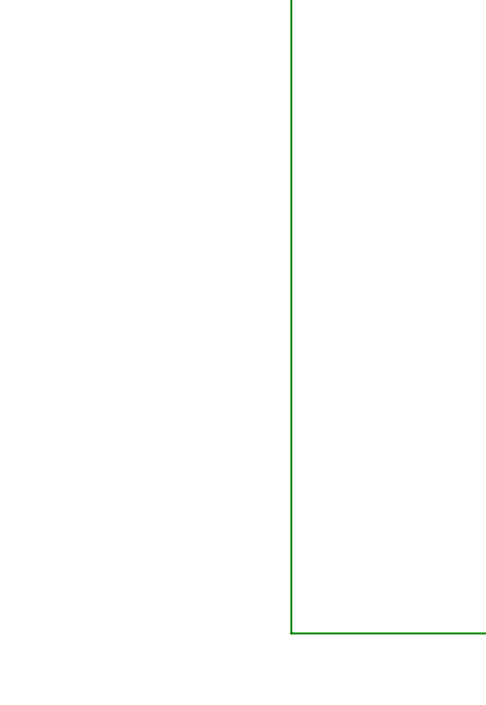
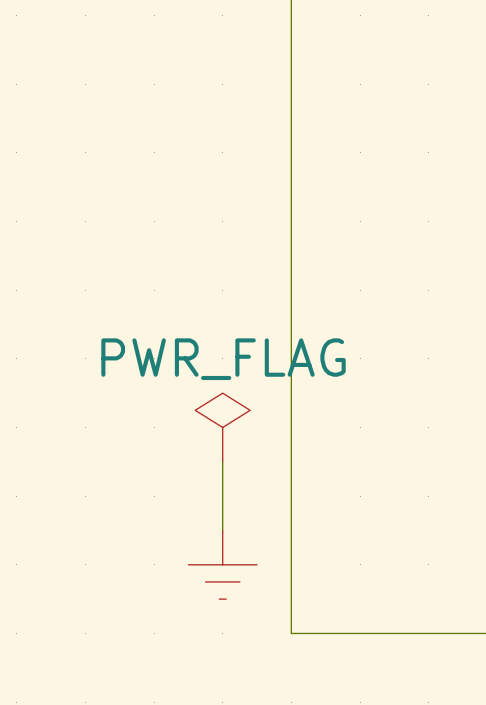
power symbol: none -> PWR_FLAG (222, 427)
wire: none -> (222, 461) (222, 530)
power symbol: none -> (222, 564)

